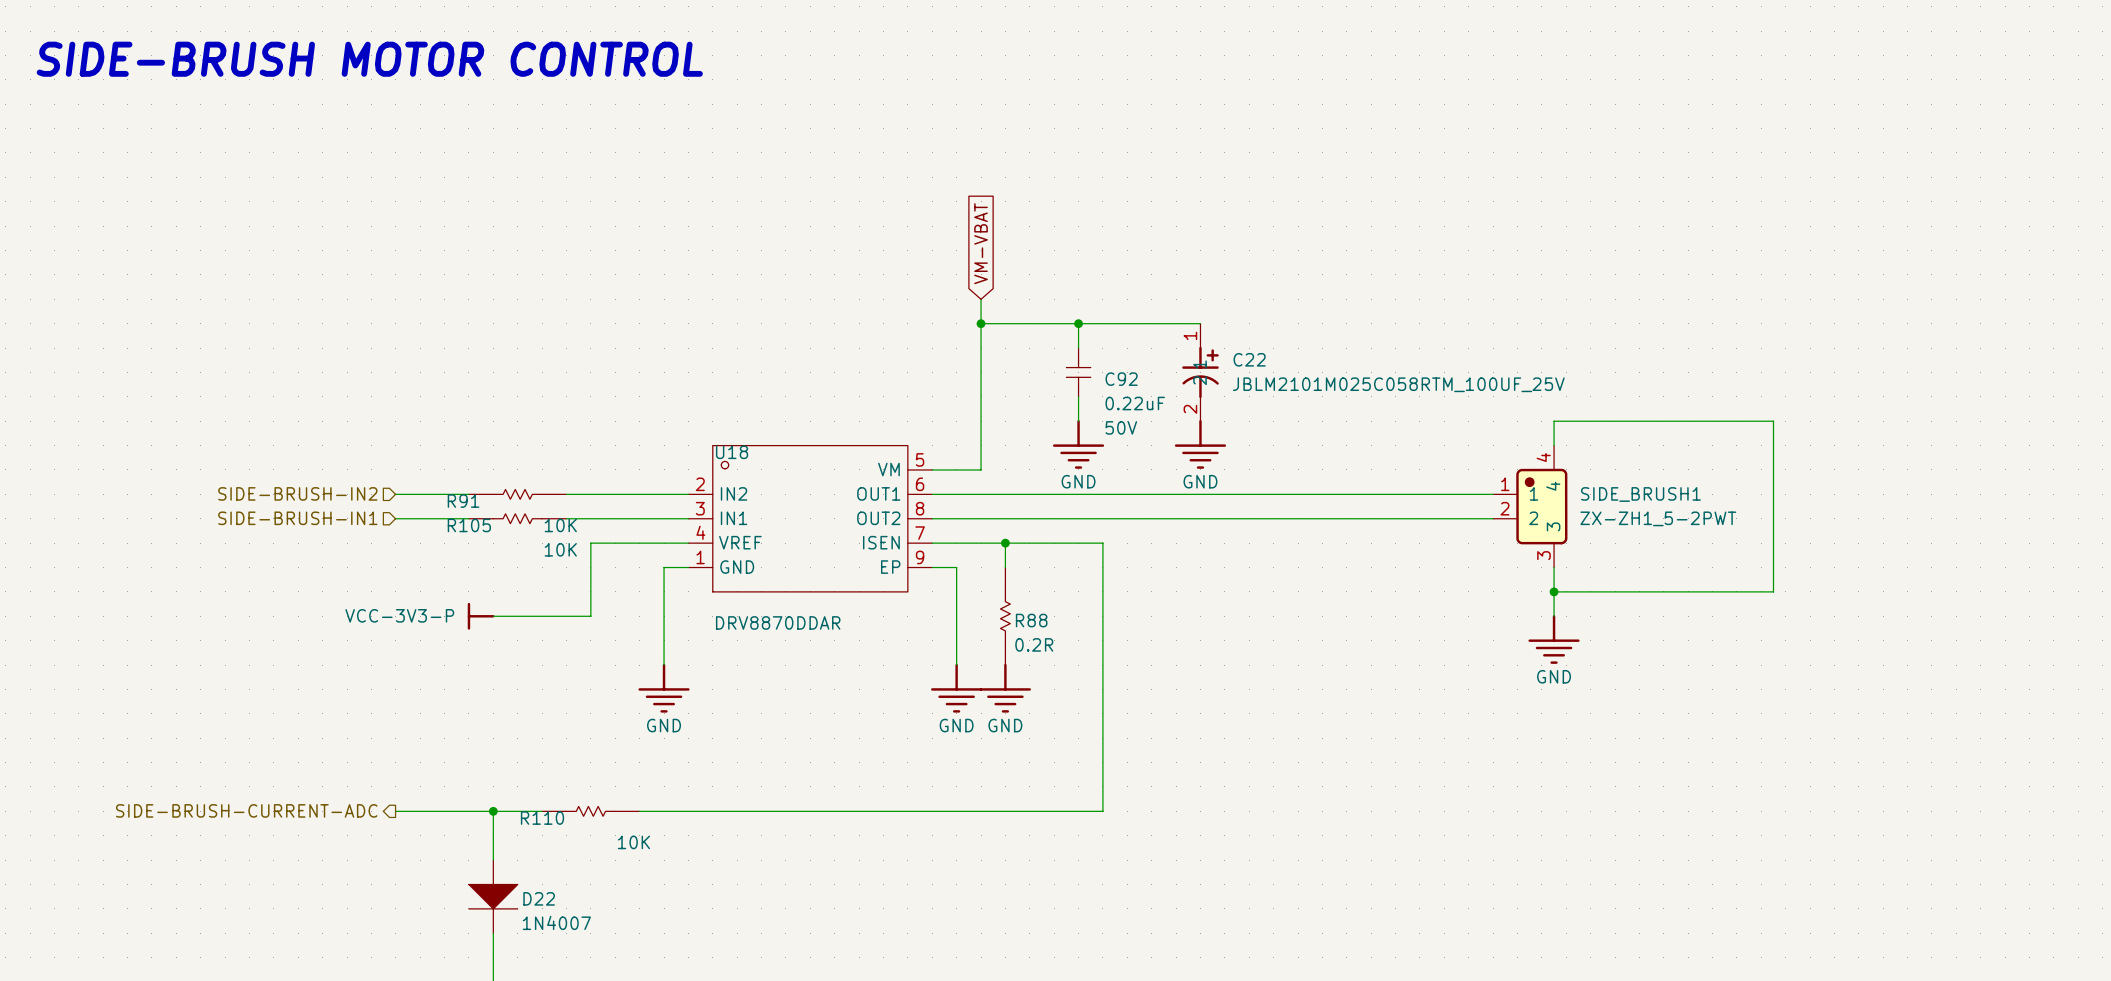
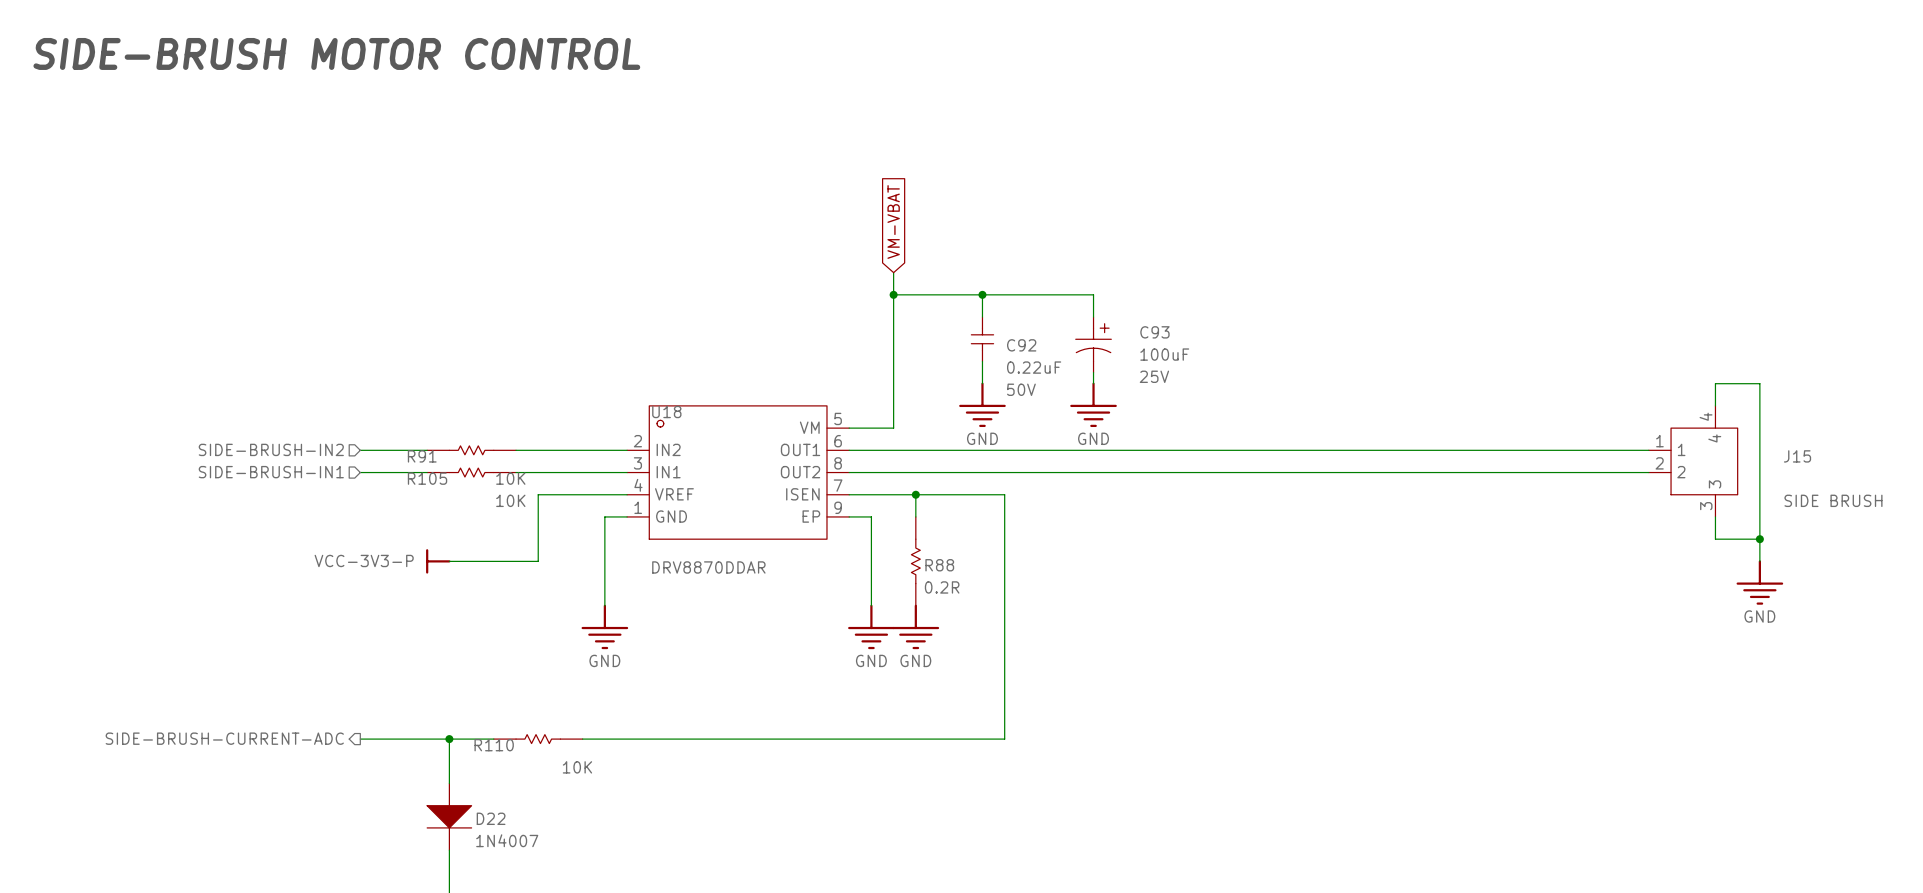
C22: JBLM2101M025C058RTM_100UF_25V (1200, 372) -> none
C93: none -> 100uF (1093, 344)
wire: (1554, 445) (1554, 421) (1773, 421) (1773, 591) (1554, 591) -> none
wire: none -> (1715, 405) (1715, 383) (1759, 383) (1759, 561)
wire: none -> (1360, 450) (1648, 450)
SIDE_BRUSH1: ZX-ZH1_5-2PWT (1530, 506) -> none
J15: none -> SIDE BRUSH (1693, 461)
wire: none -> (1360, 472) (1648, 472)
wire: (1554, 567) (1554, 616) -> none
wire: none -> (1715, 516) (1715, 539) (1759, 539)
junction: (1554, 591) -> none
junction: none -> (1759, 539)
power symbol: GND (1554, 639) -> none
power symbol: none -> GND (1759, 582)

